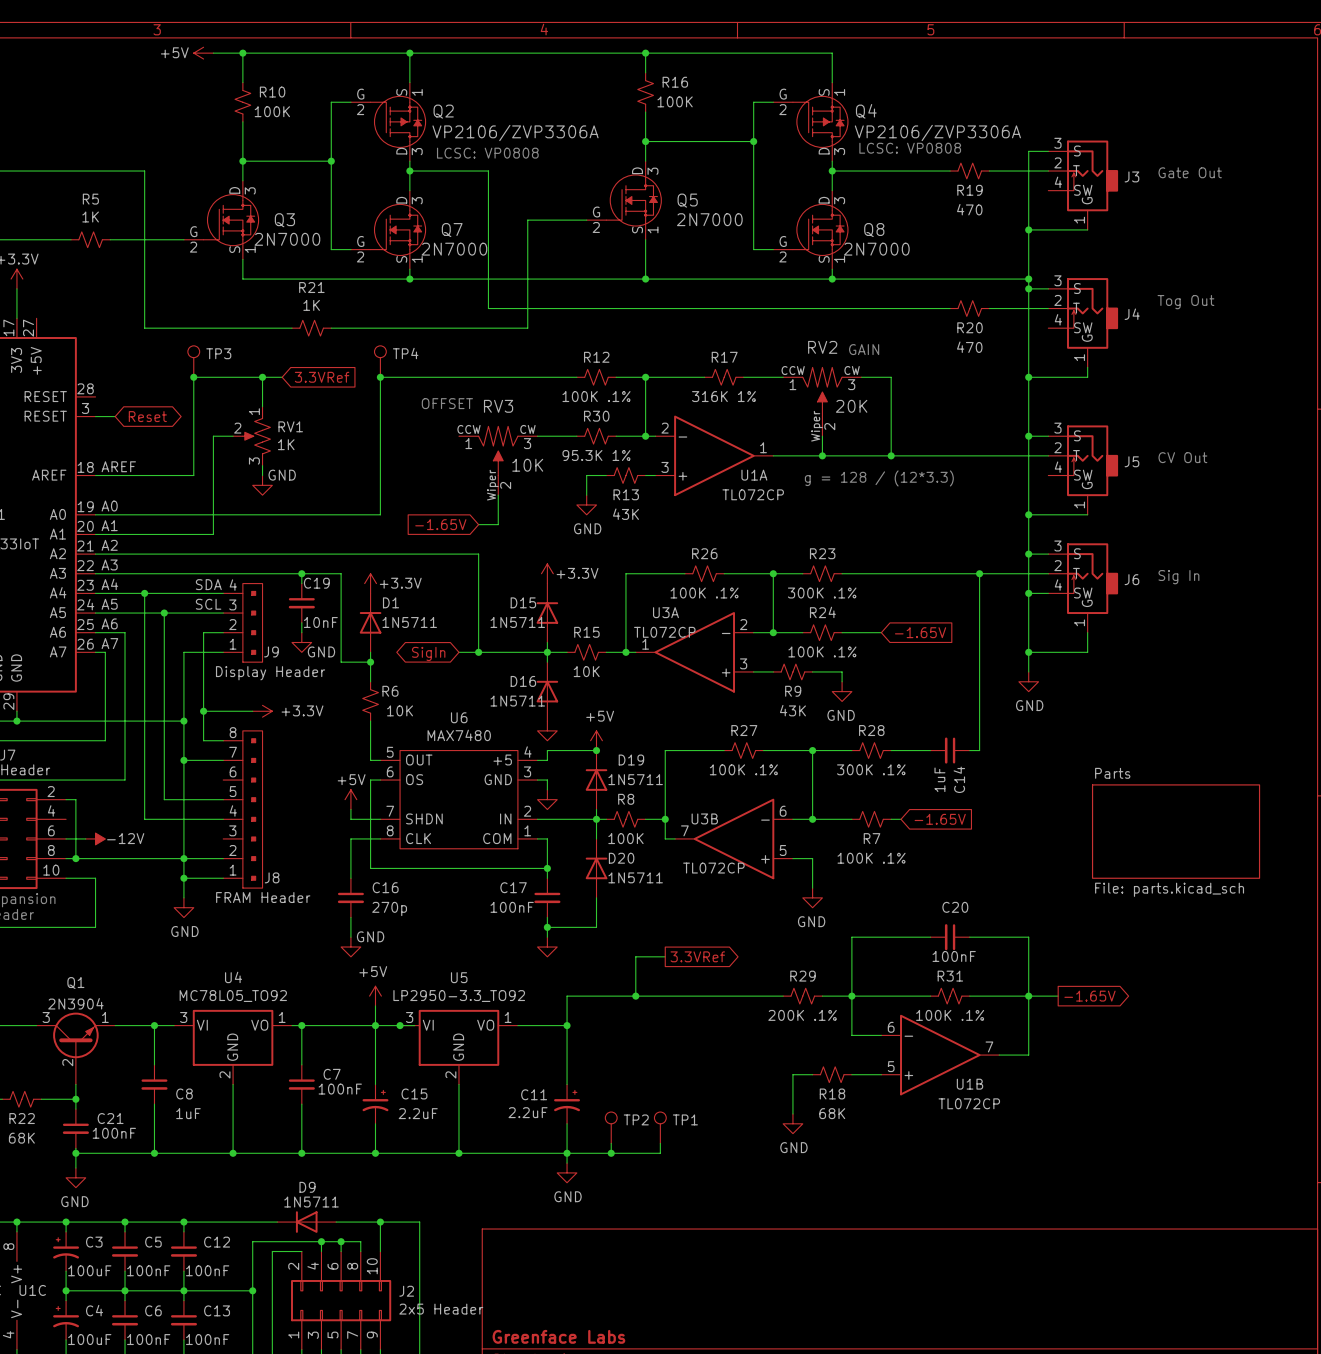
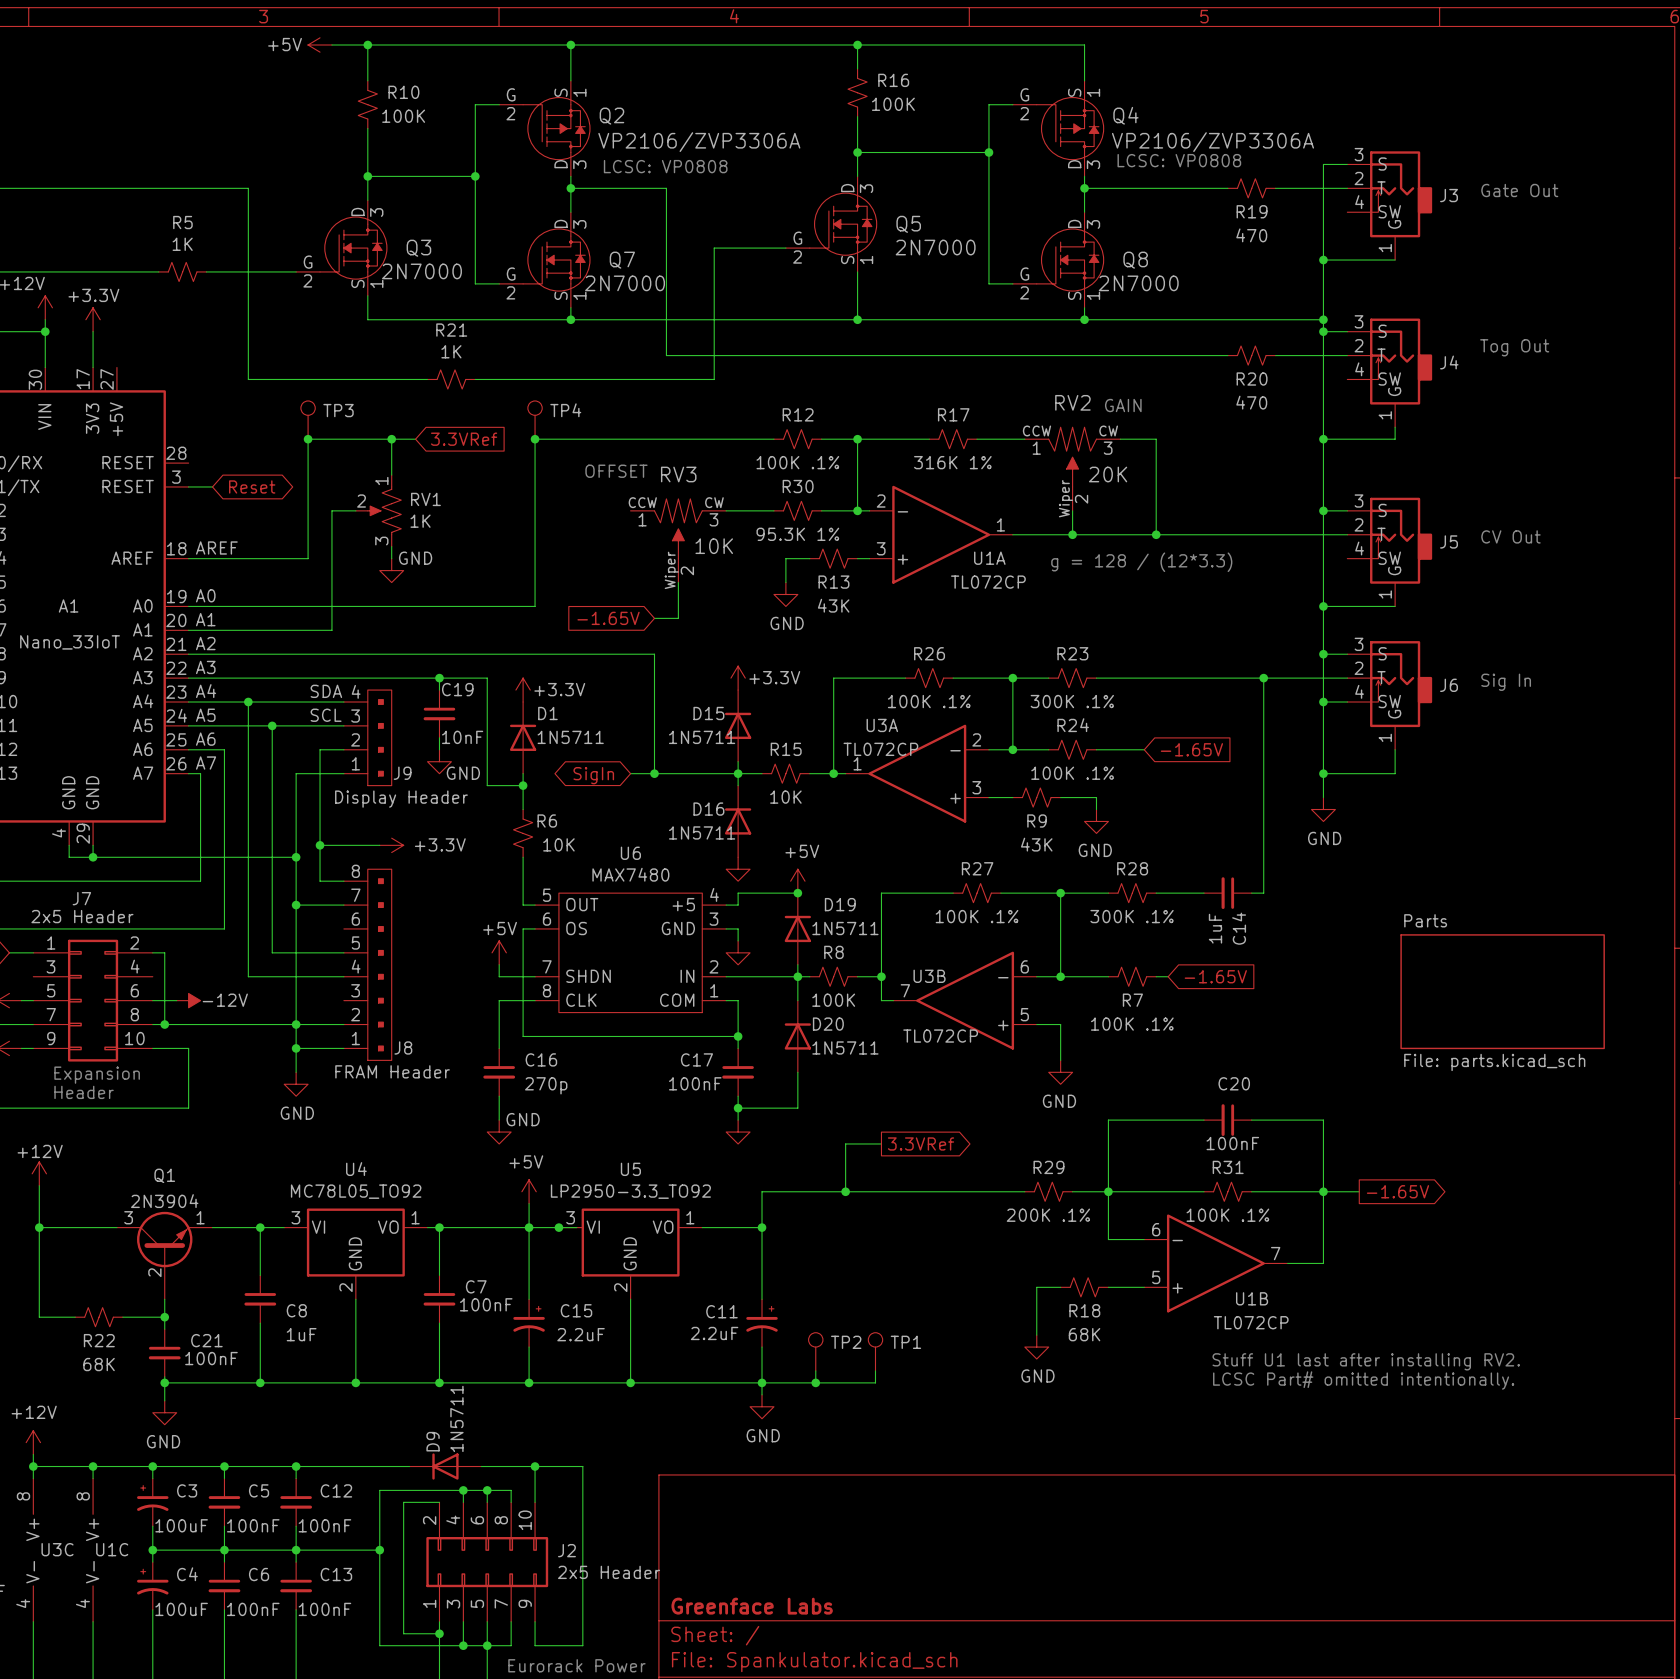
text: none -> Stuff U1 last after installing RV2. (1366, 1361)
text: none -> LCSC Part# omitted intentionally. (1363, 1380)
D9 name rotation: 0° (307, 1187) -> 90° counterclockwise (433, 1441)
D9 value rotation: 0° (311, 1202) -> 90° counterclockwise (456, 1418)

